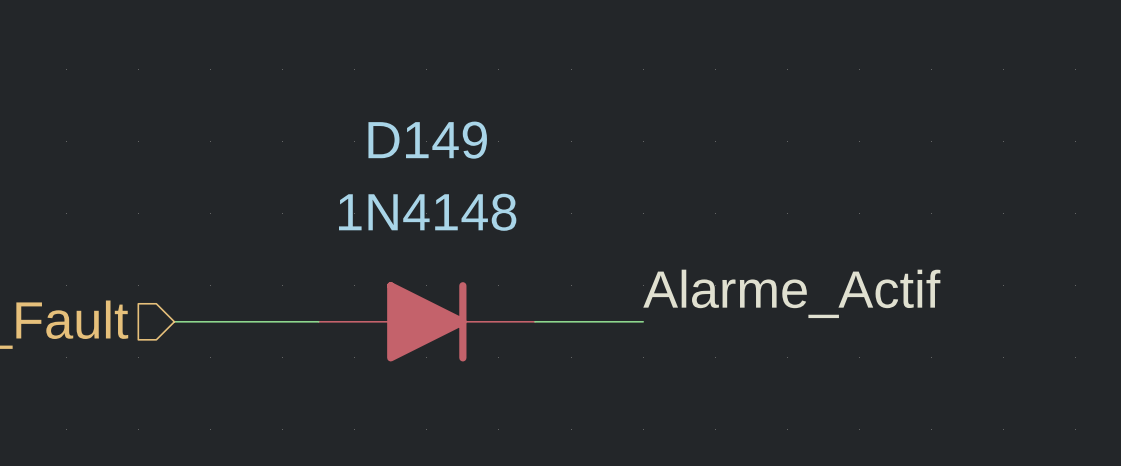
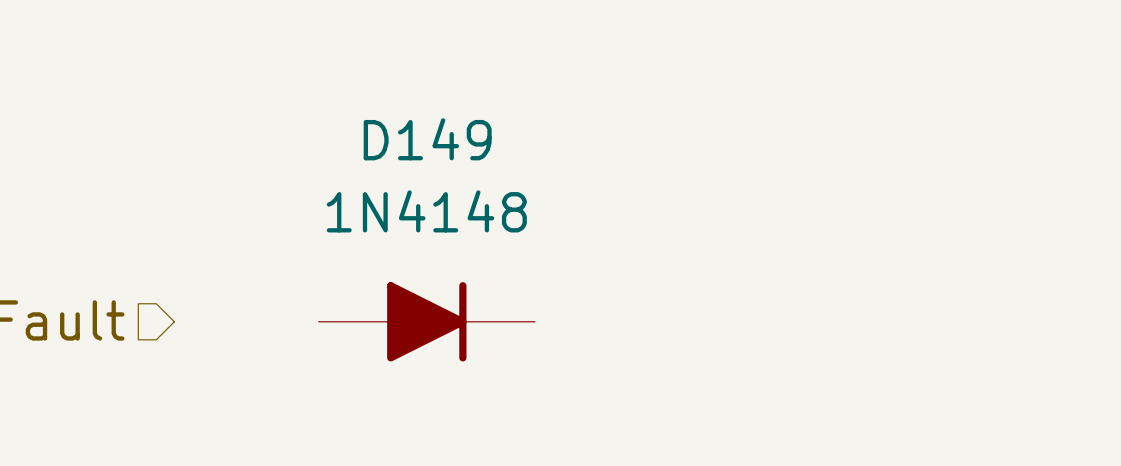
label: Alarme_Actif (791, 293) -> none
wire: (174, 321) (318, 321) -> none
wire: (534, 321) (643, 321) -> none

